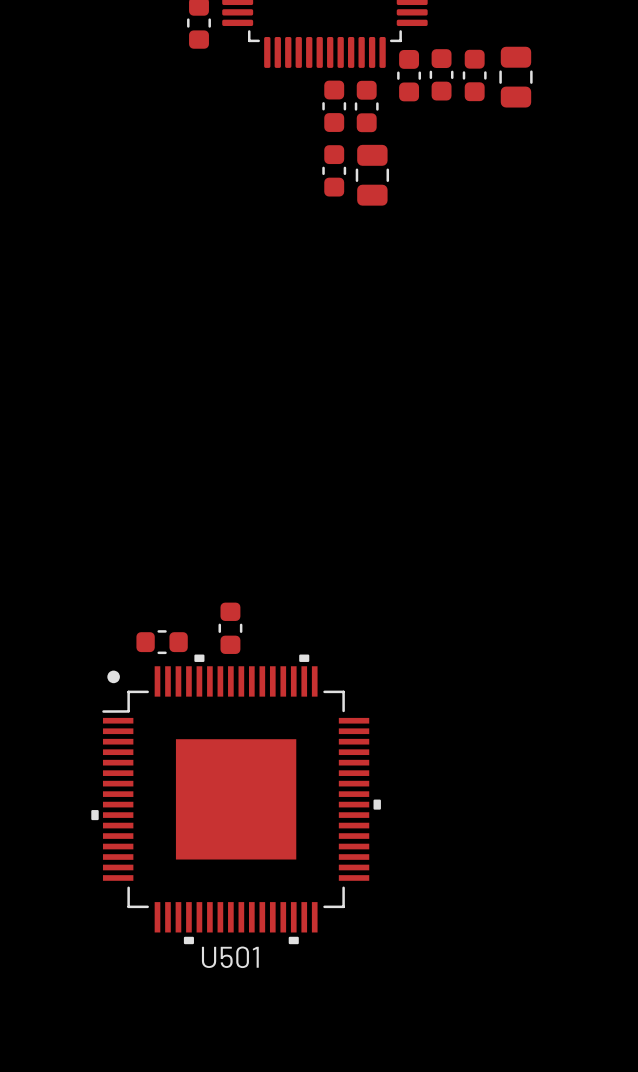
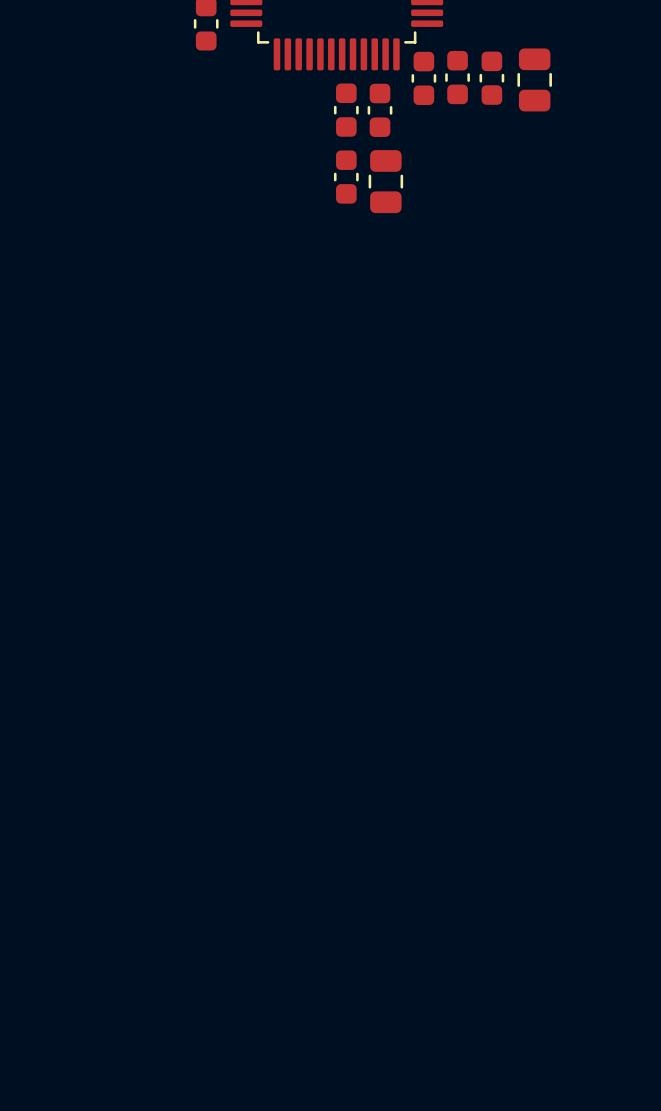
part: (230, 628) -> none
part: (162, 642) -> none
U501: (236, 799) -> none

